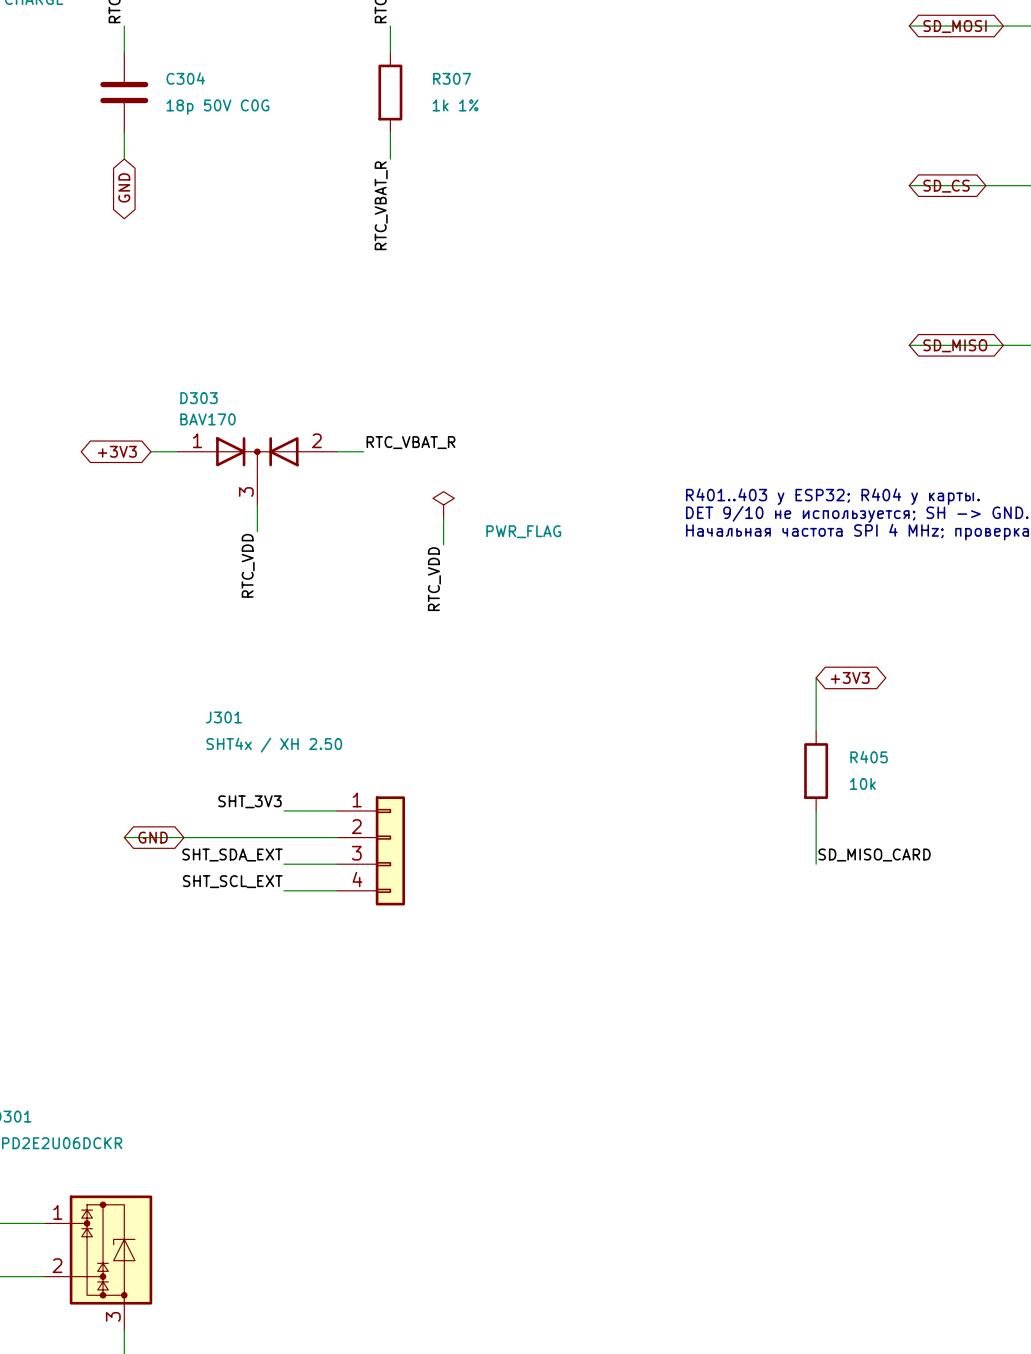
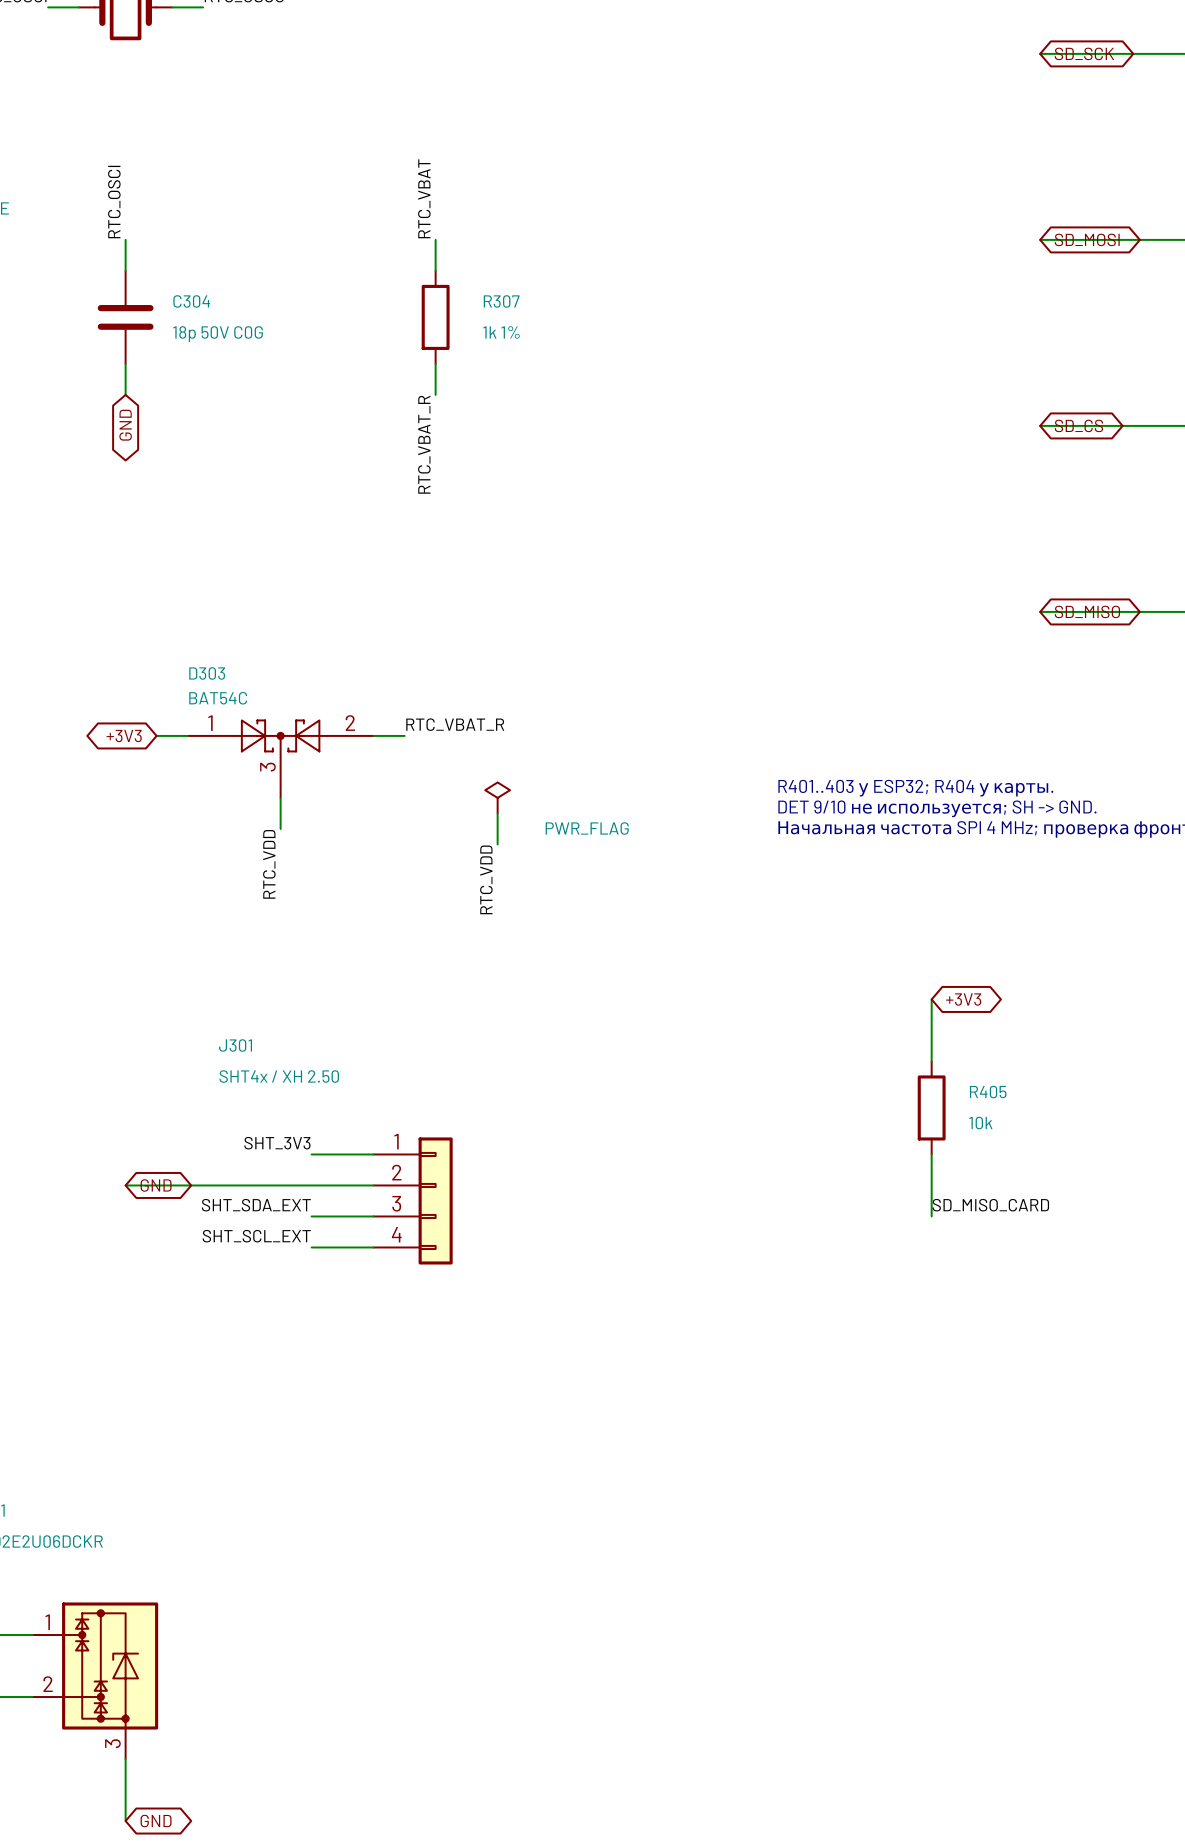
D303 value: BAV170 (208, 419) -> BAT54C (218, 698)
D303 symbol: [177, 437, 338, 505] -> [187, 720, 374, 798]

